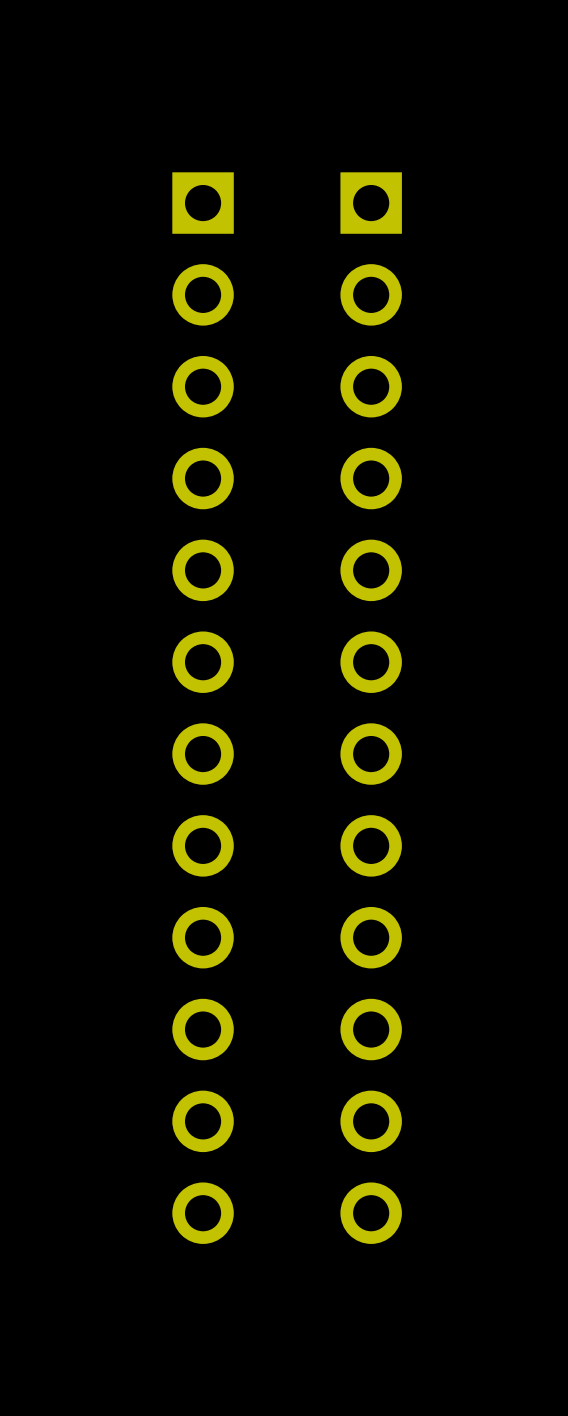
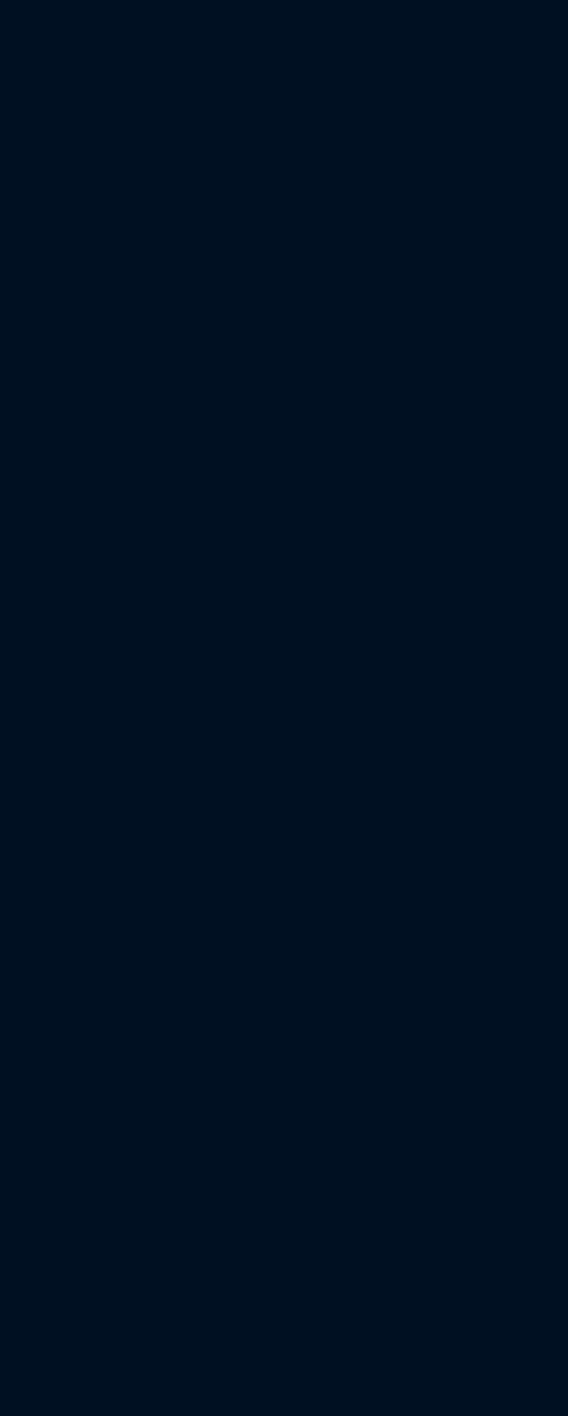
part: (203, 708) -> none
part: (371, 708) -> none

